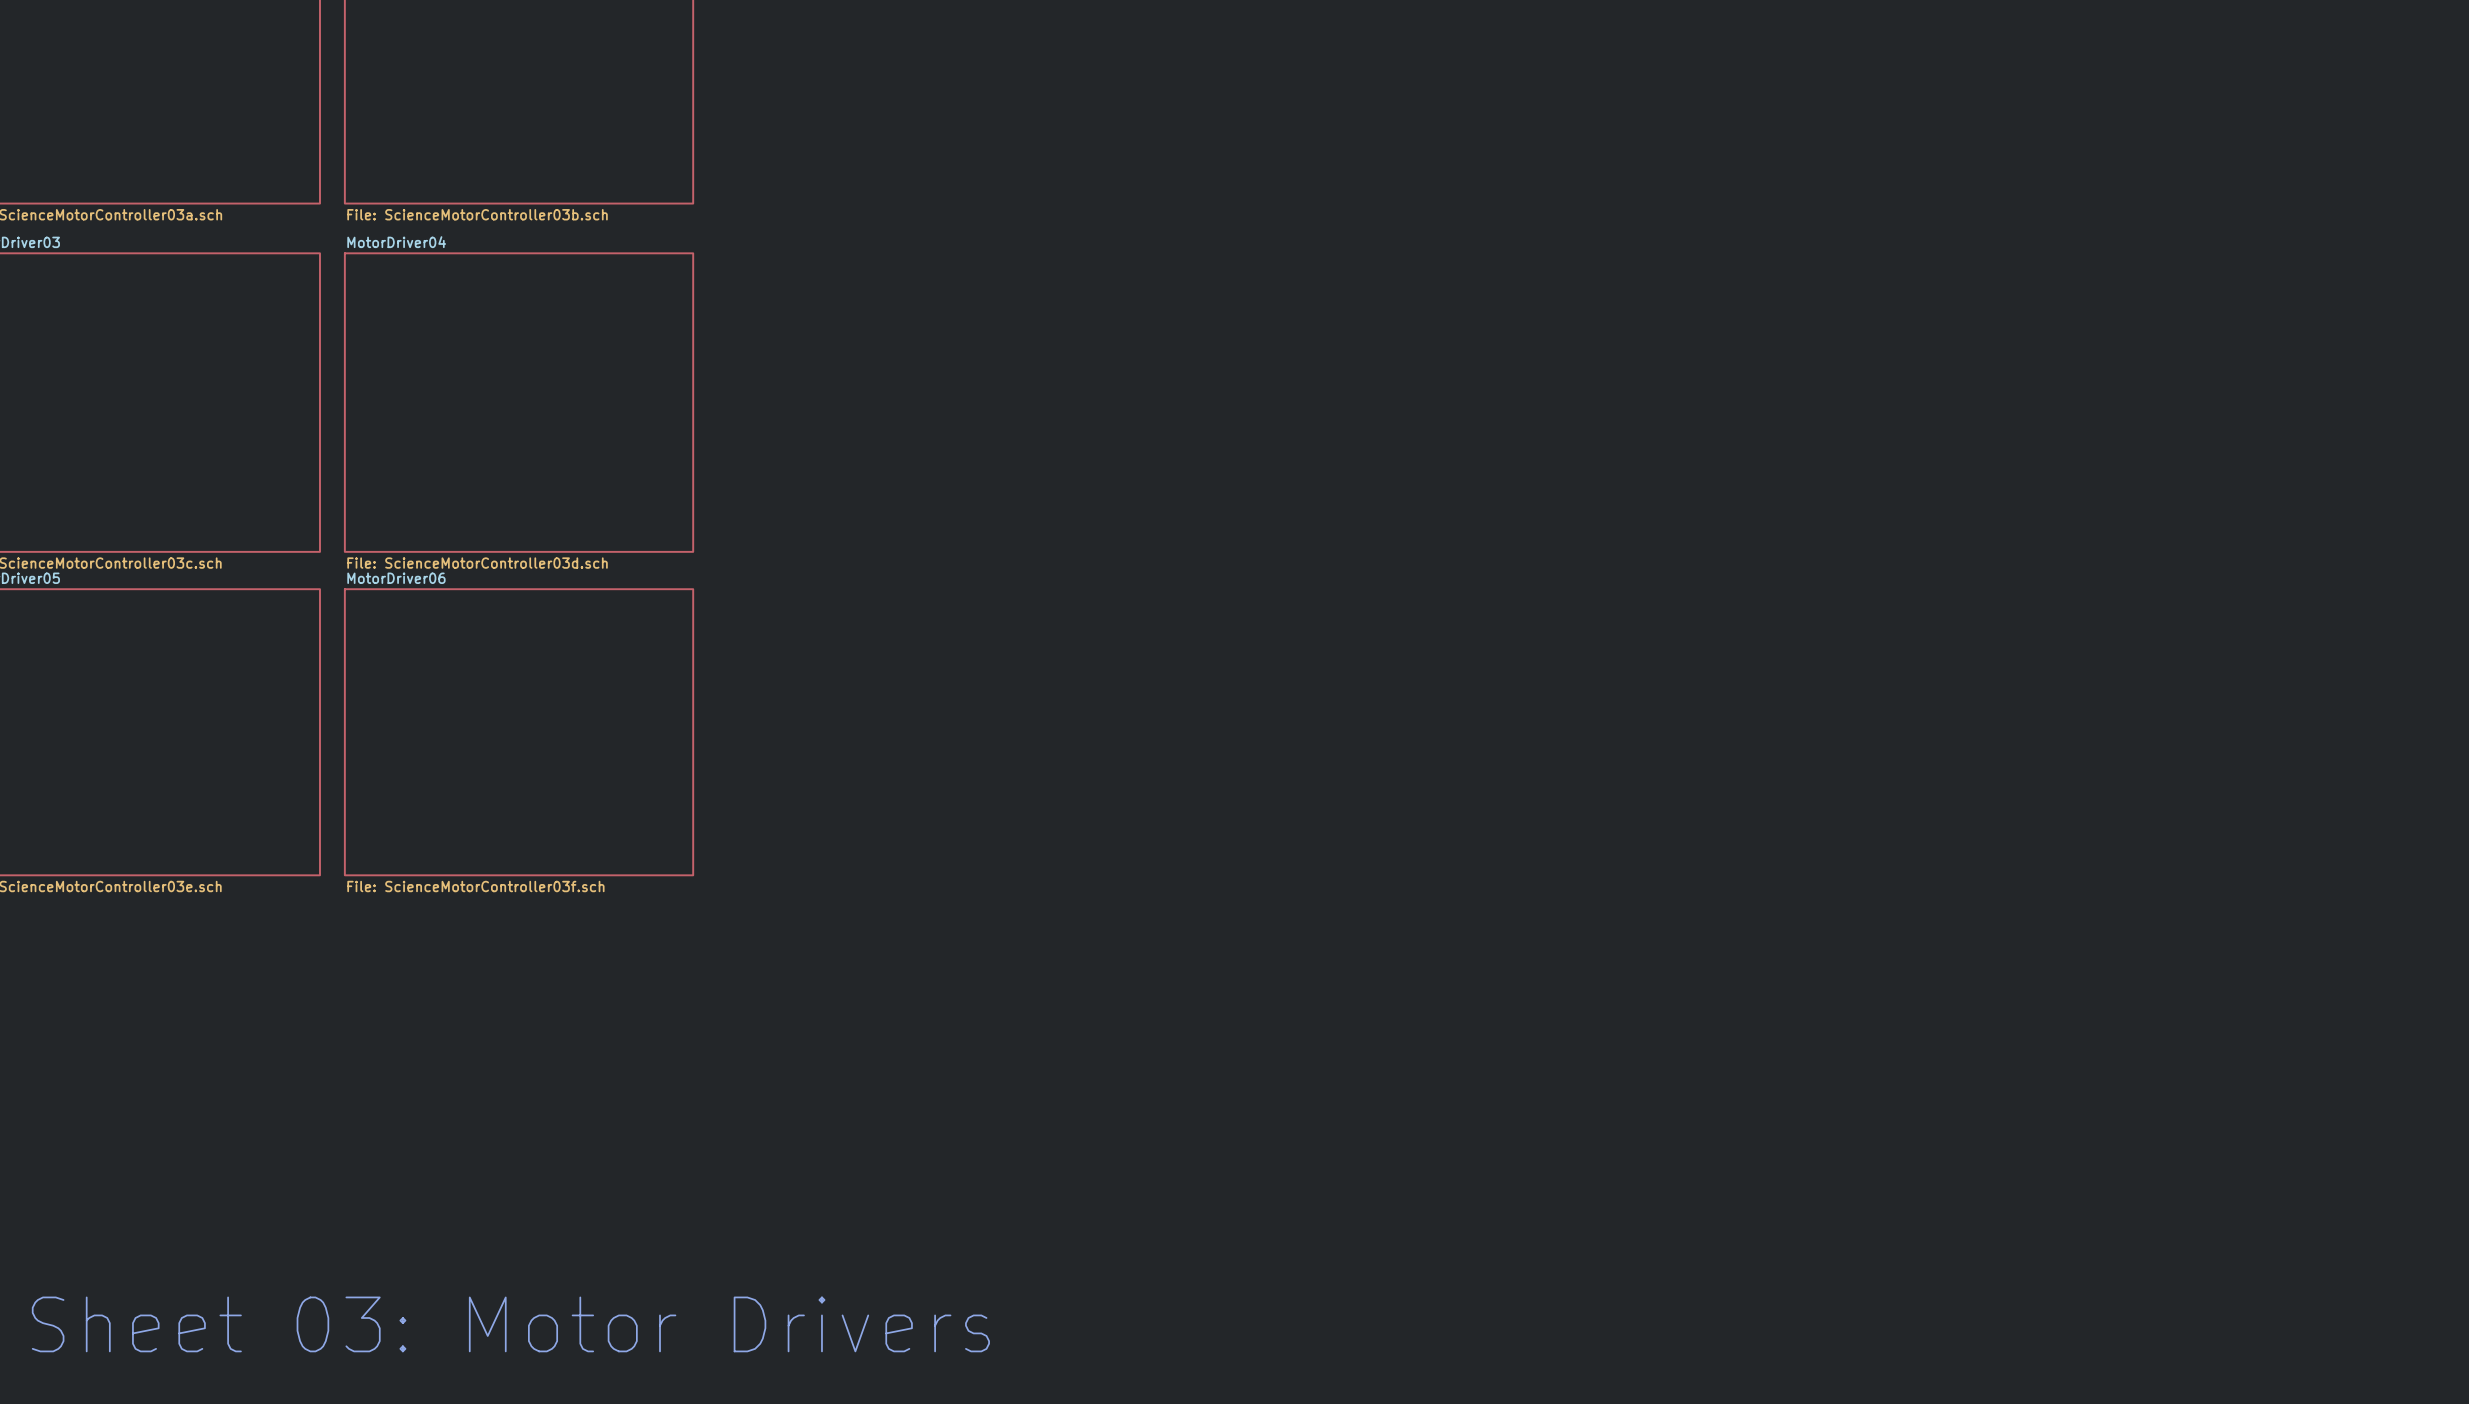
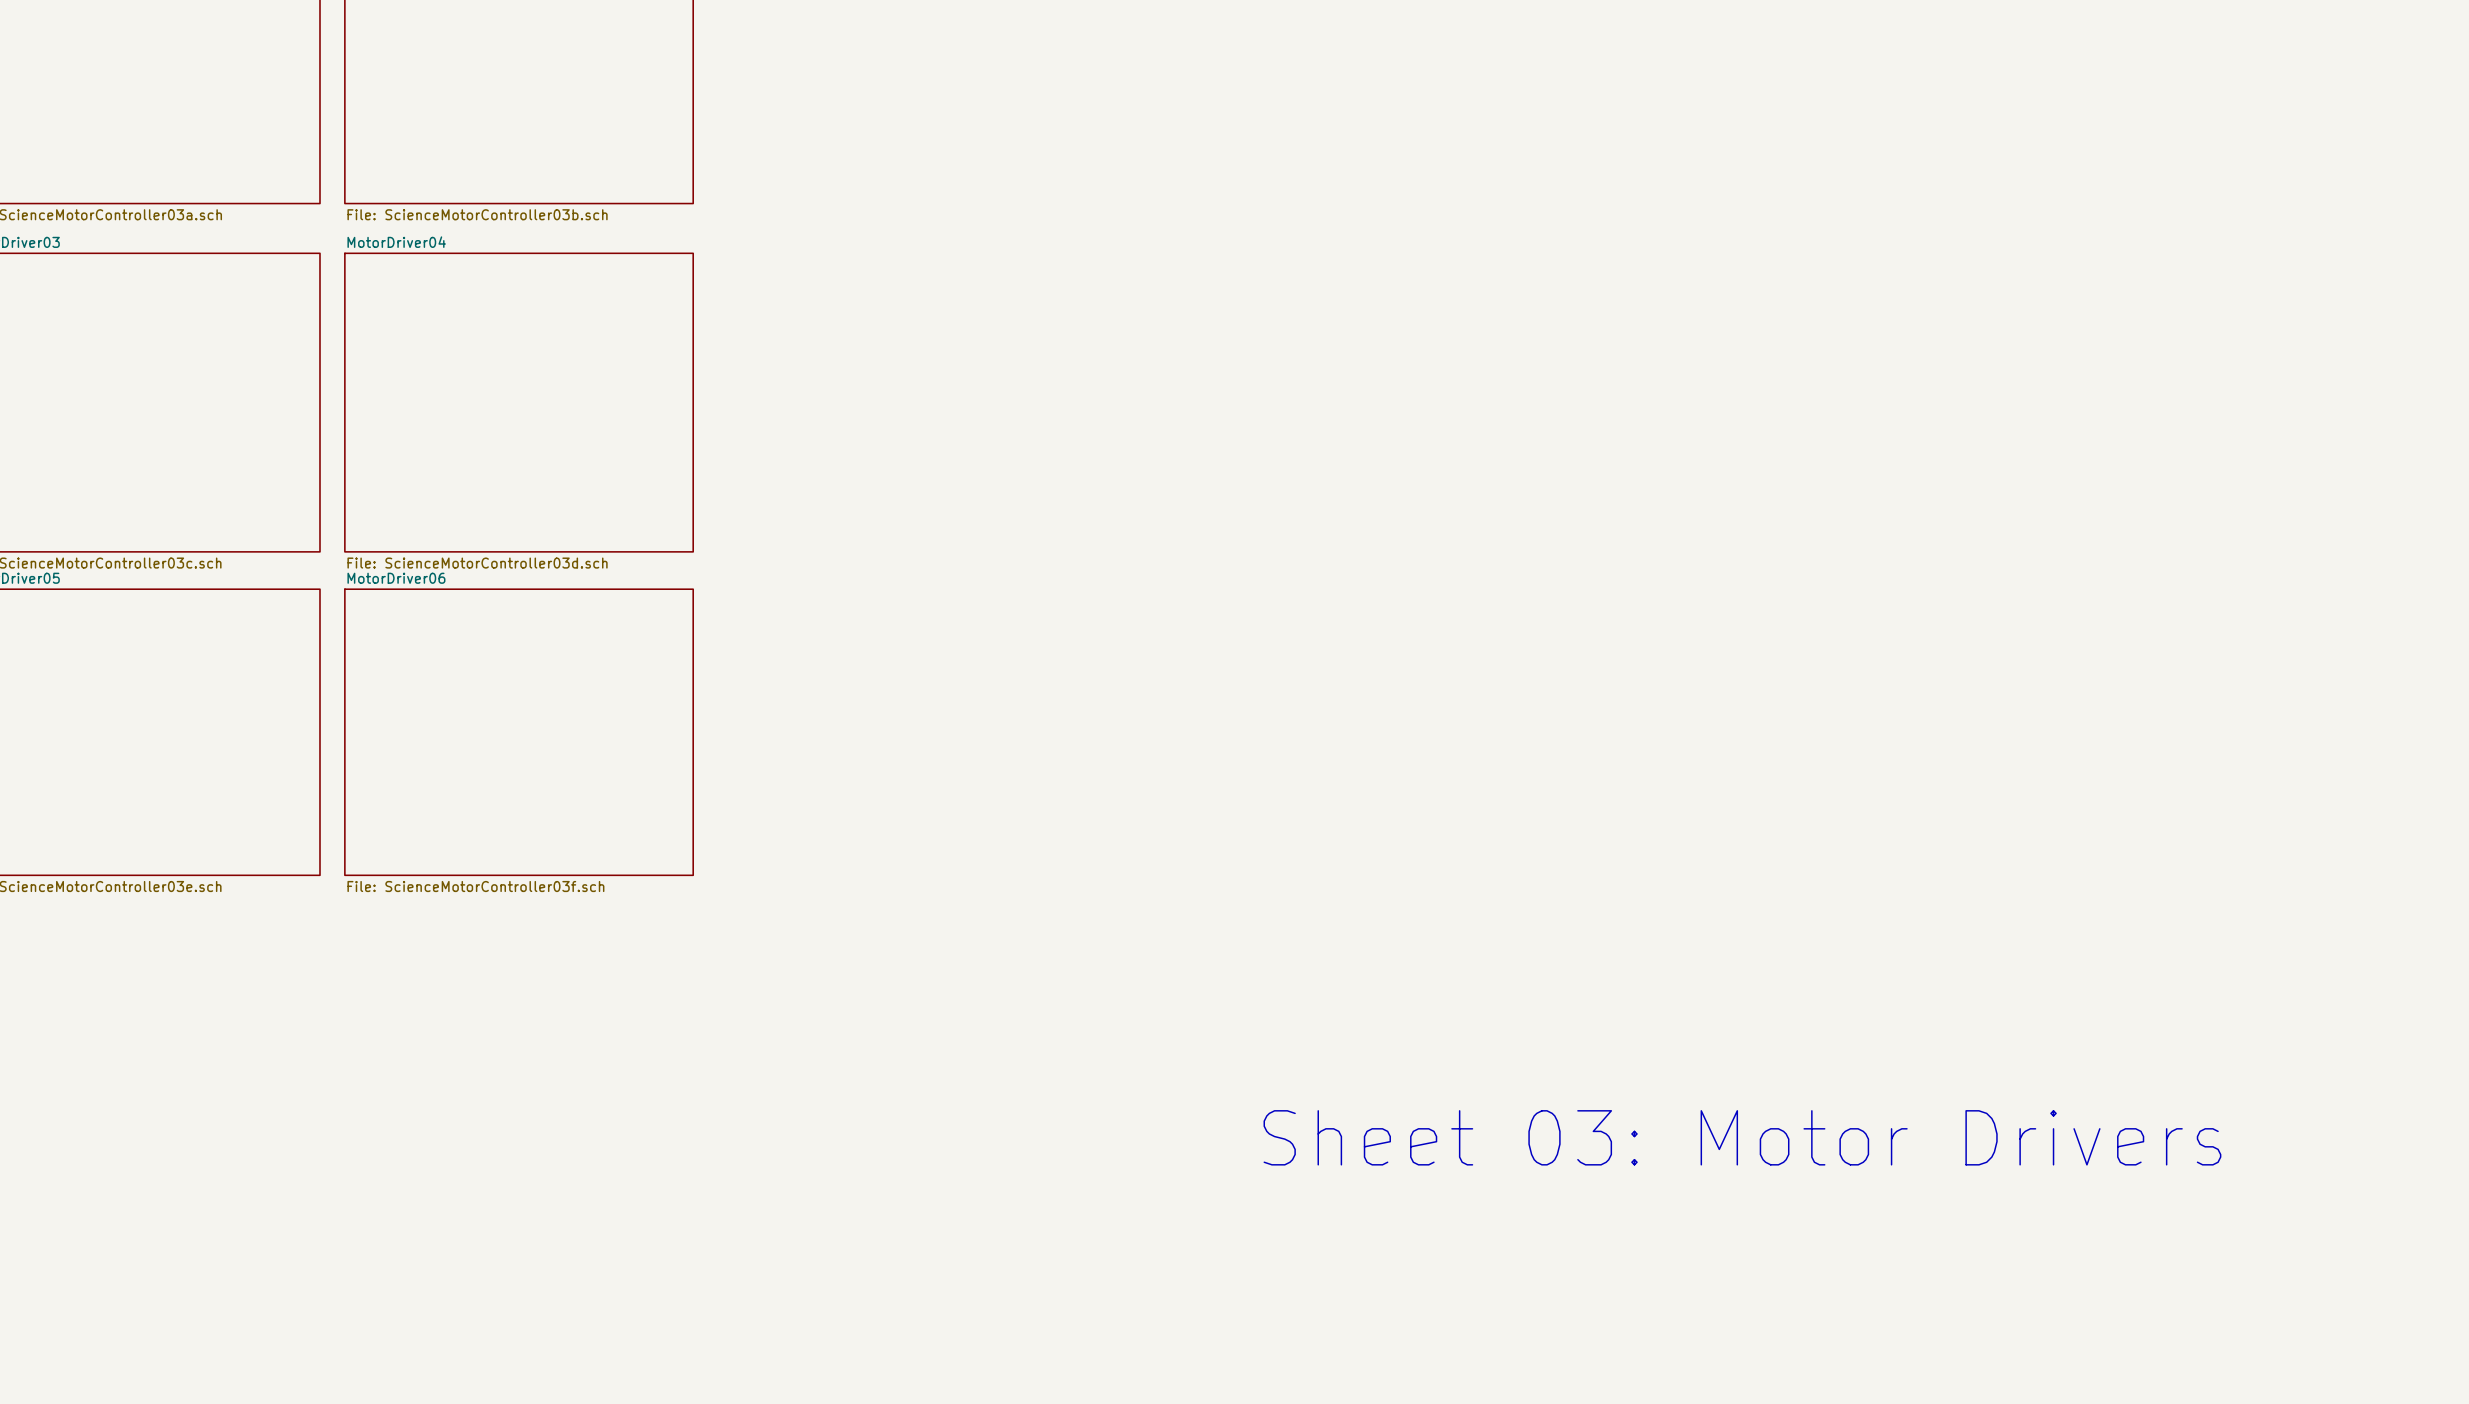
text: none -> Sheet 03: Motor Drivers (1742, 1137)
text: Sheet 03: Motor Drivers (510, 1324) -> none

